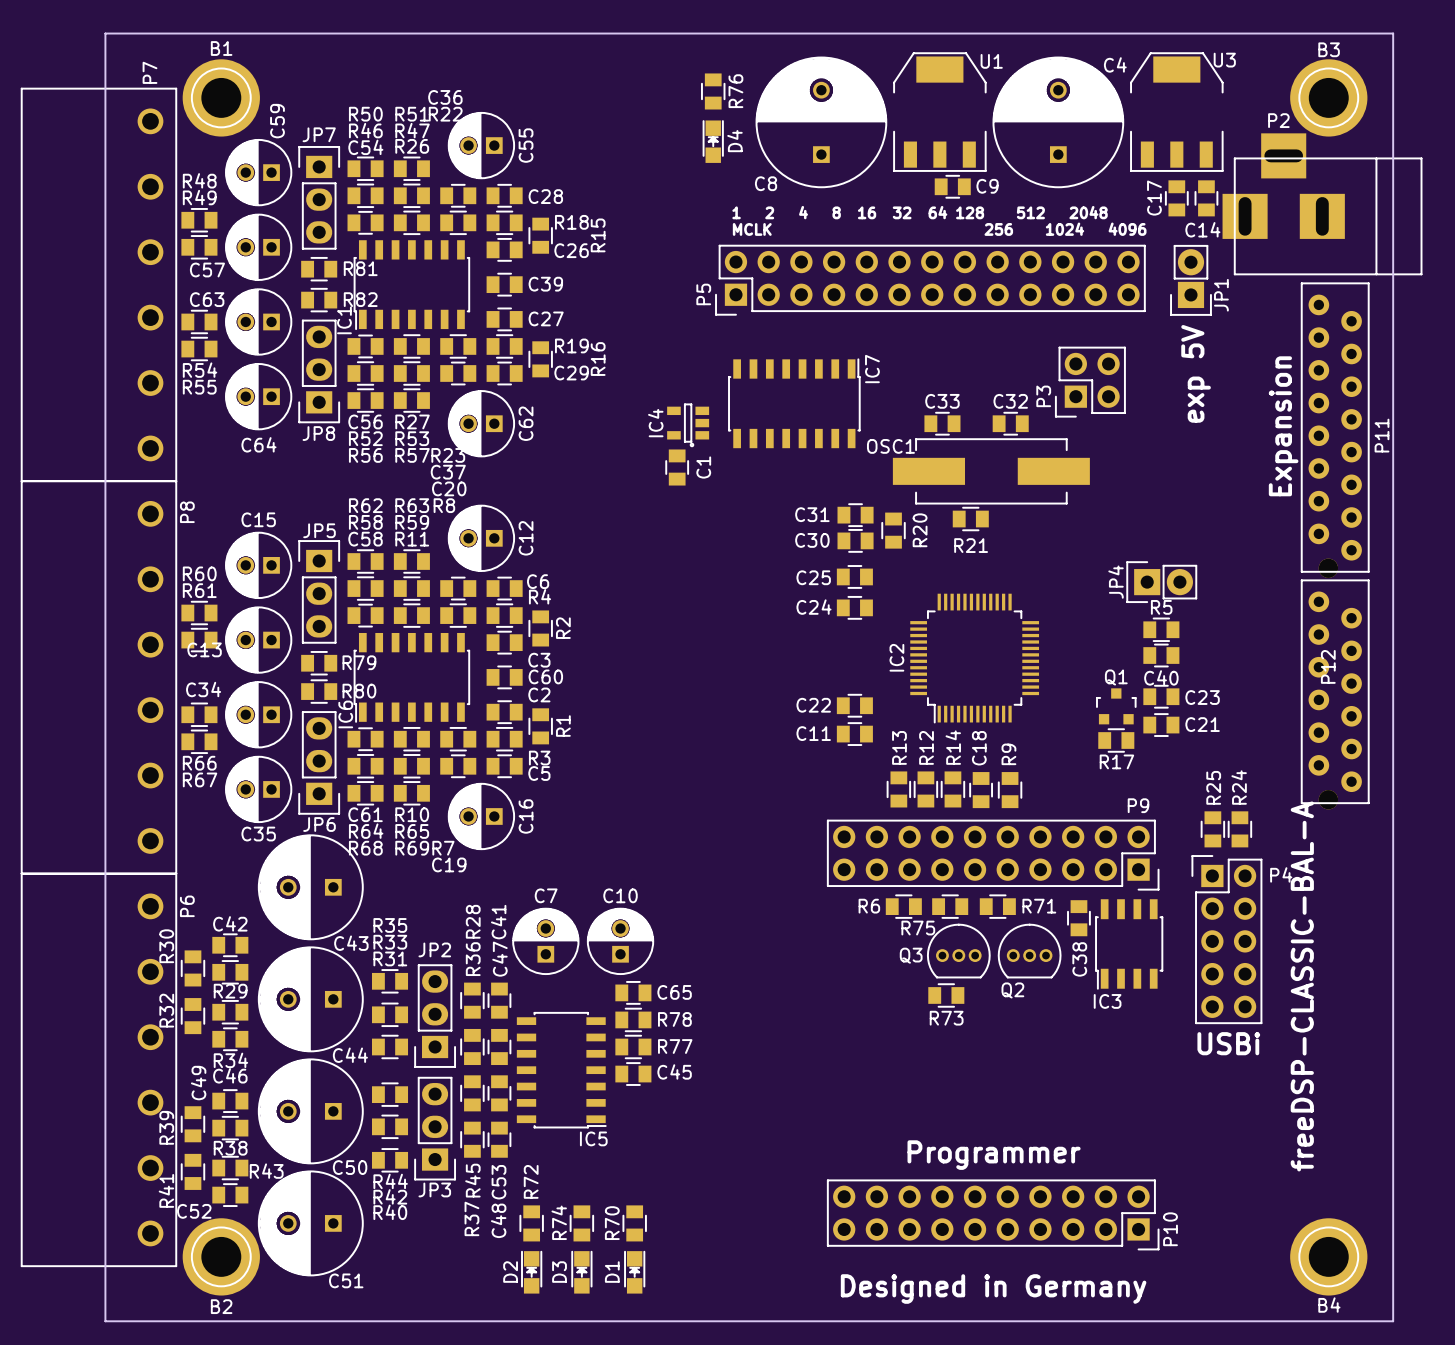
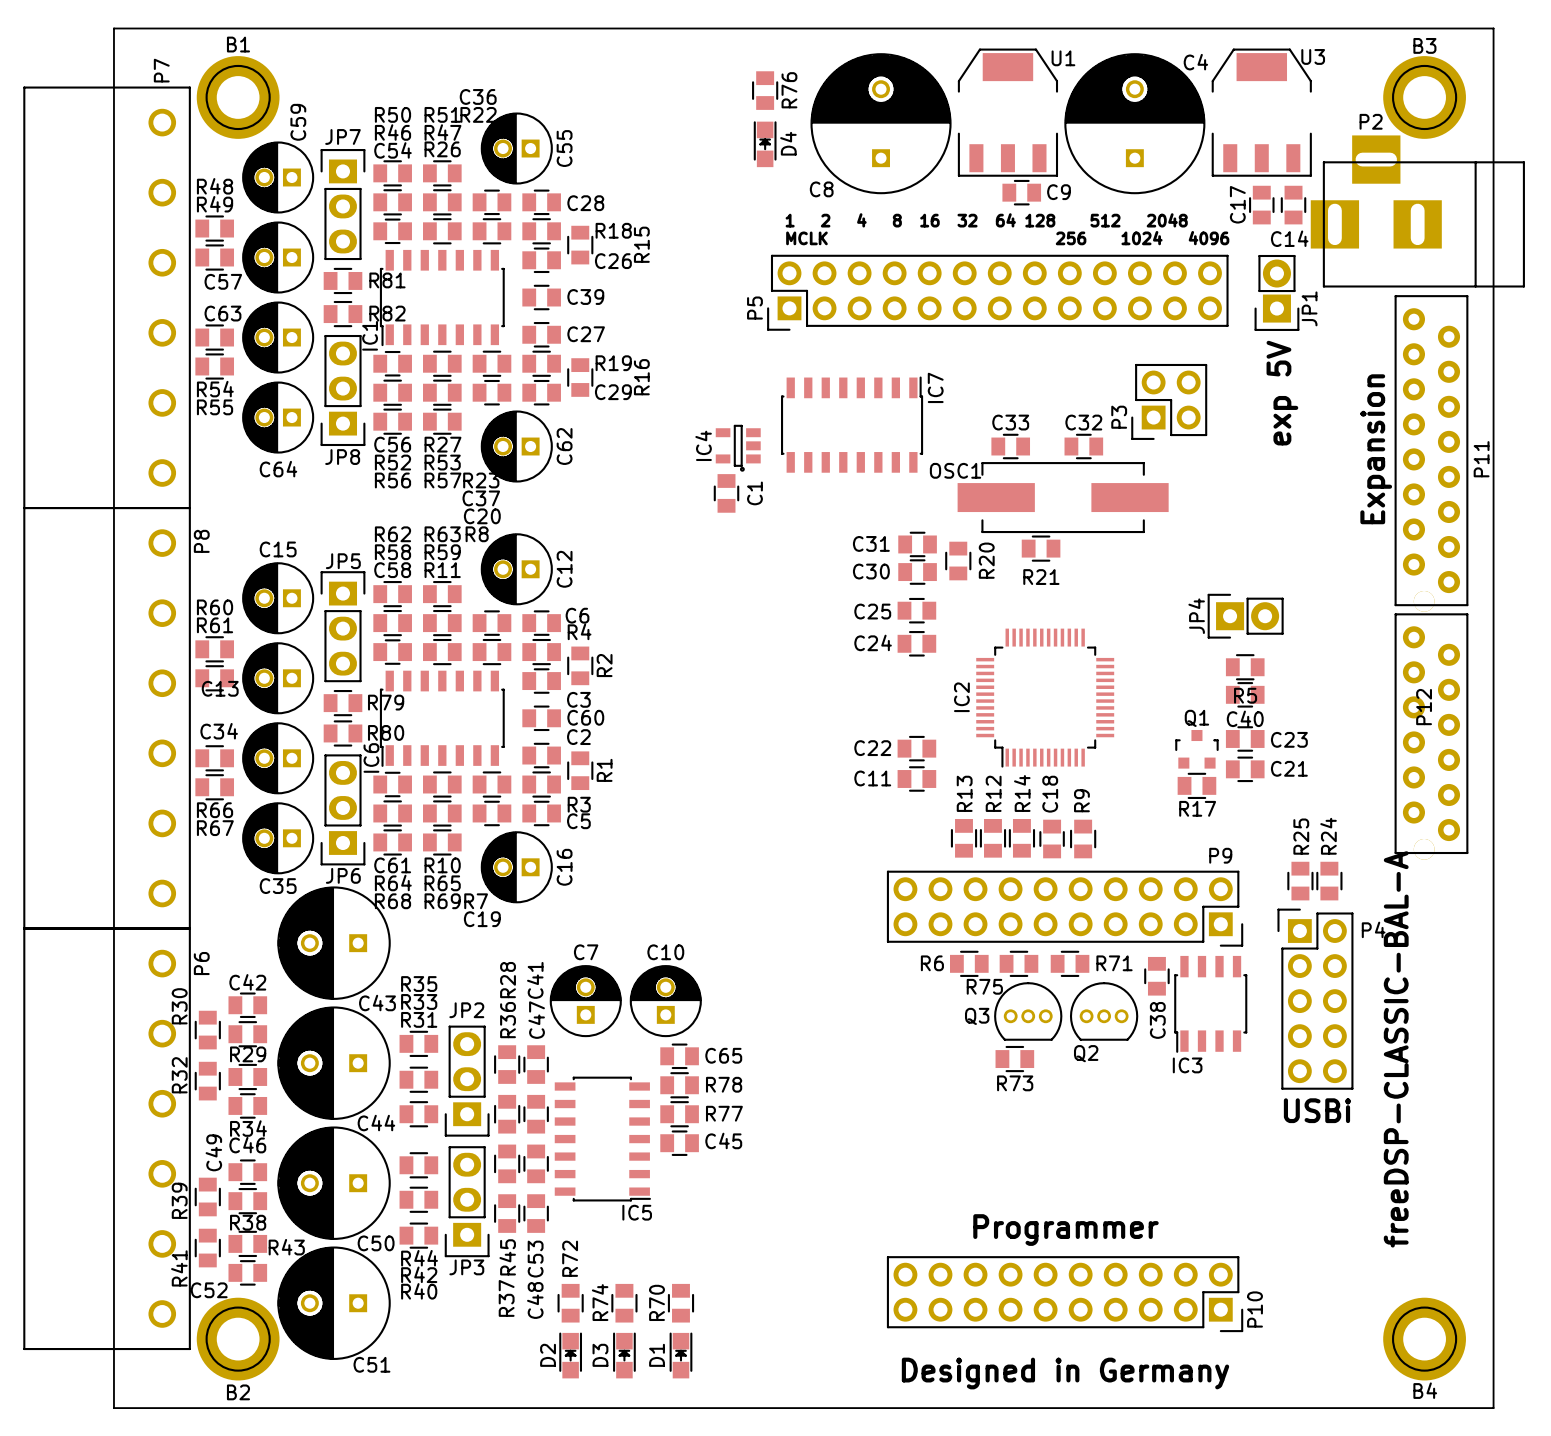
R5 name position: R5 (1161, 607) -> R5 (1245, 695)

